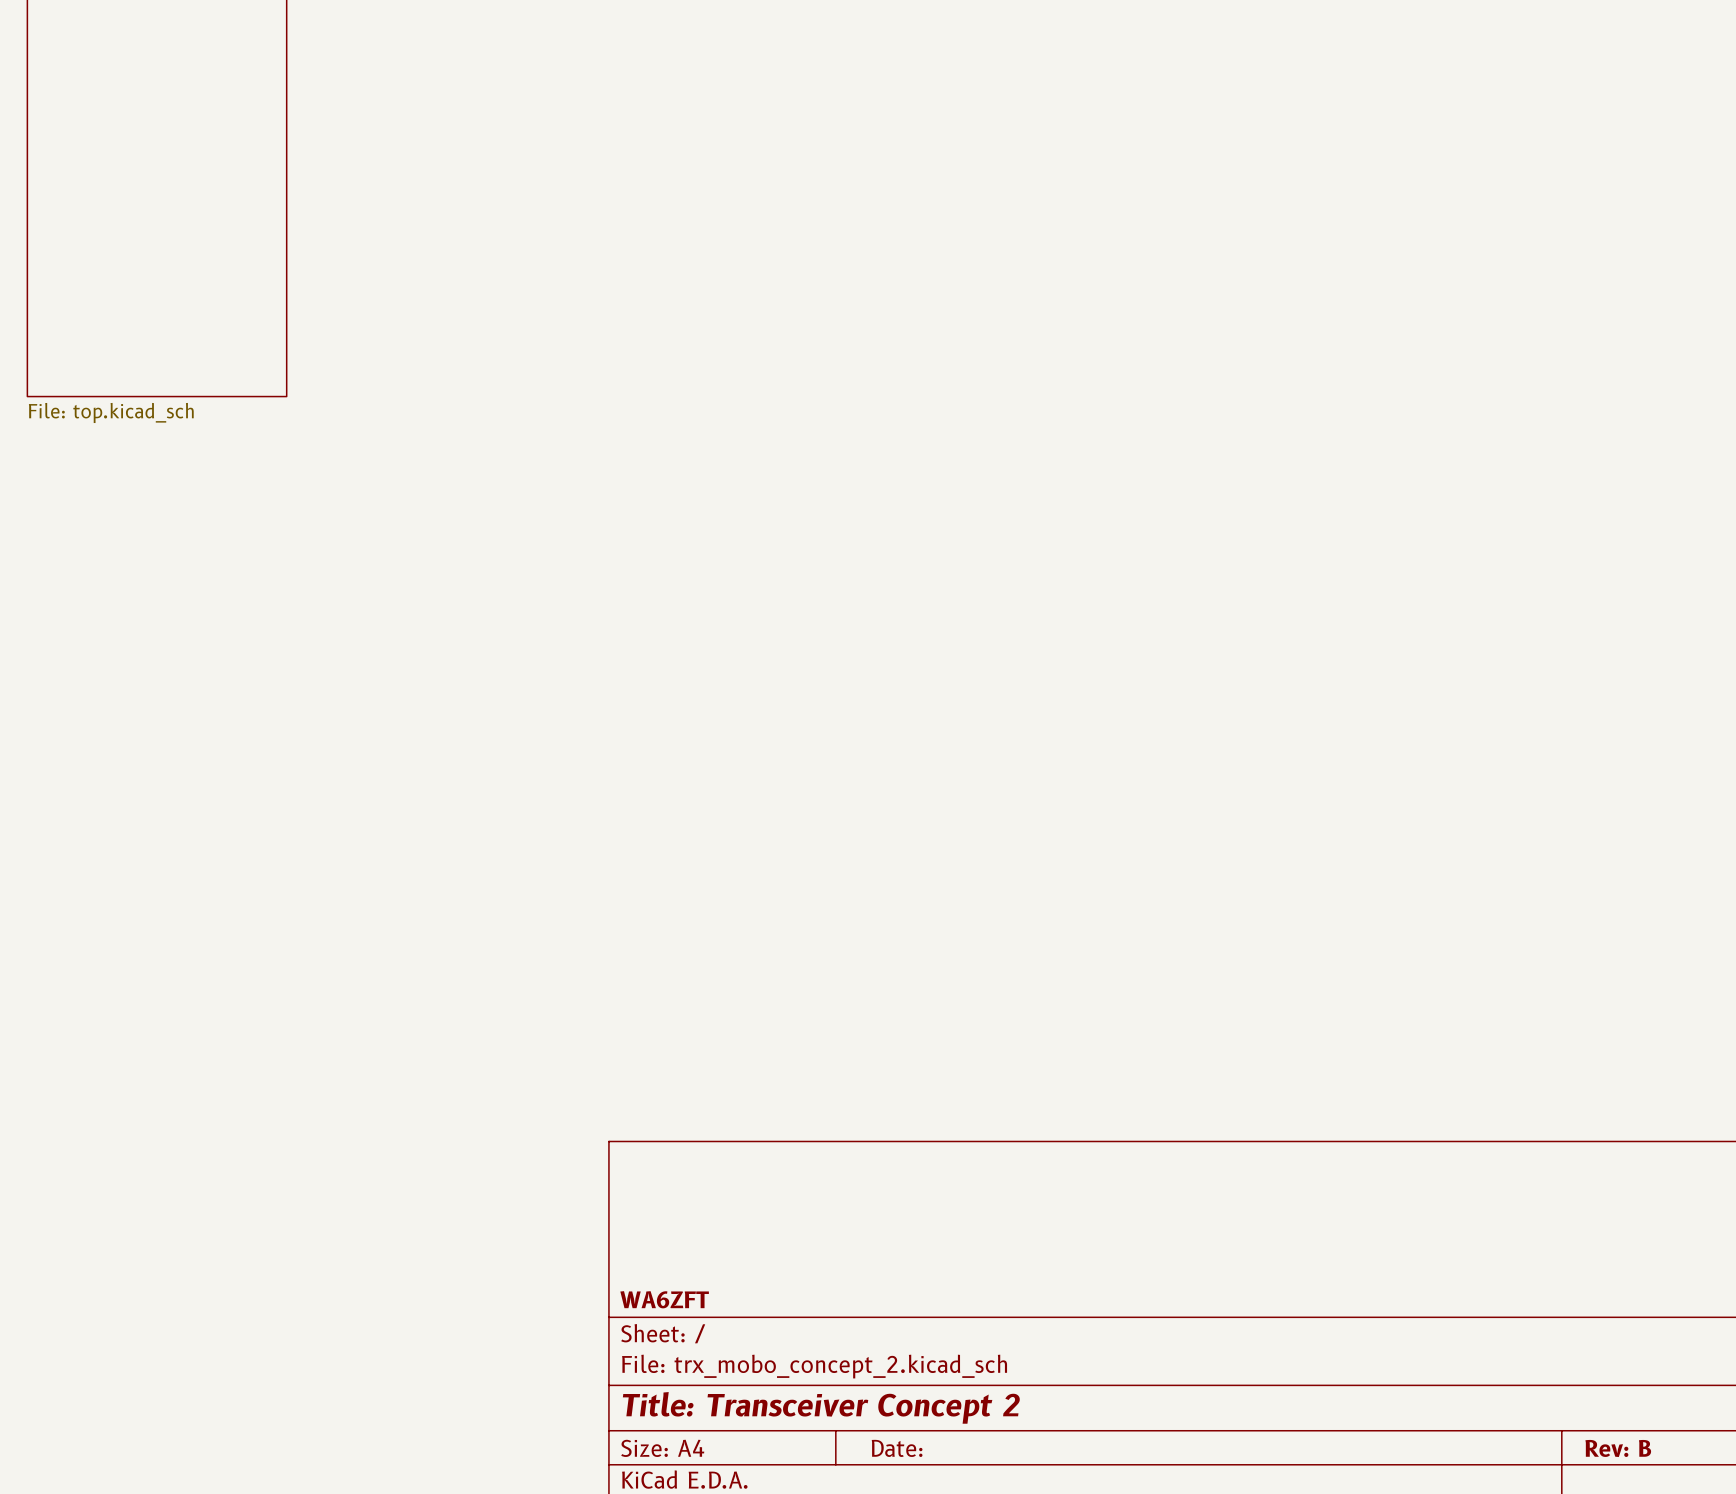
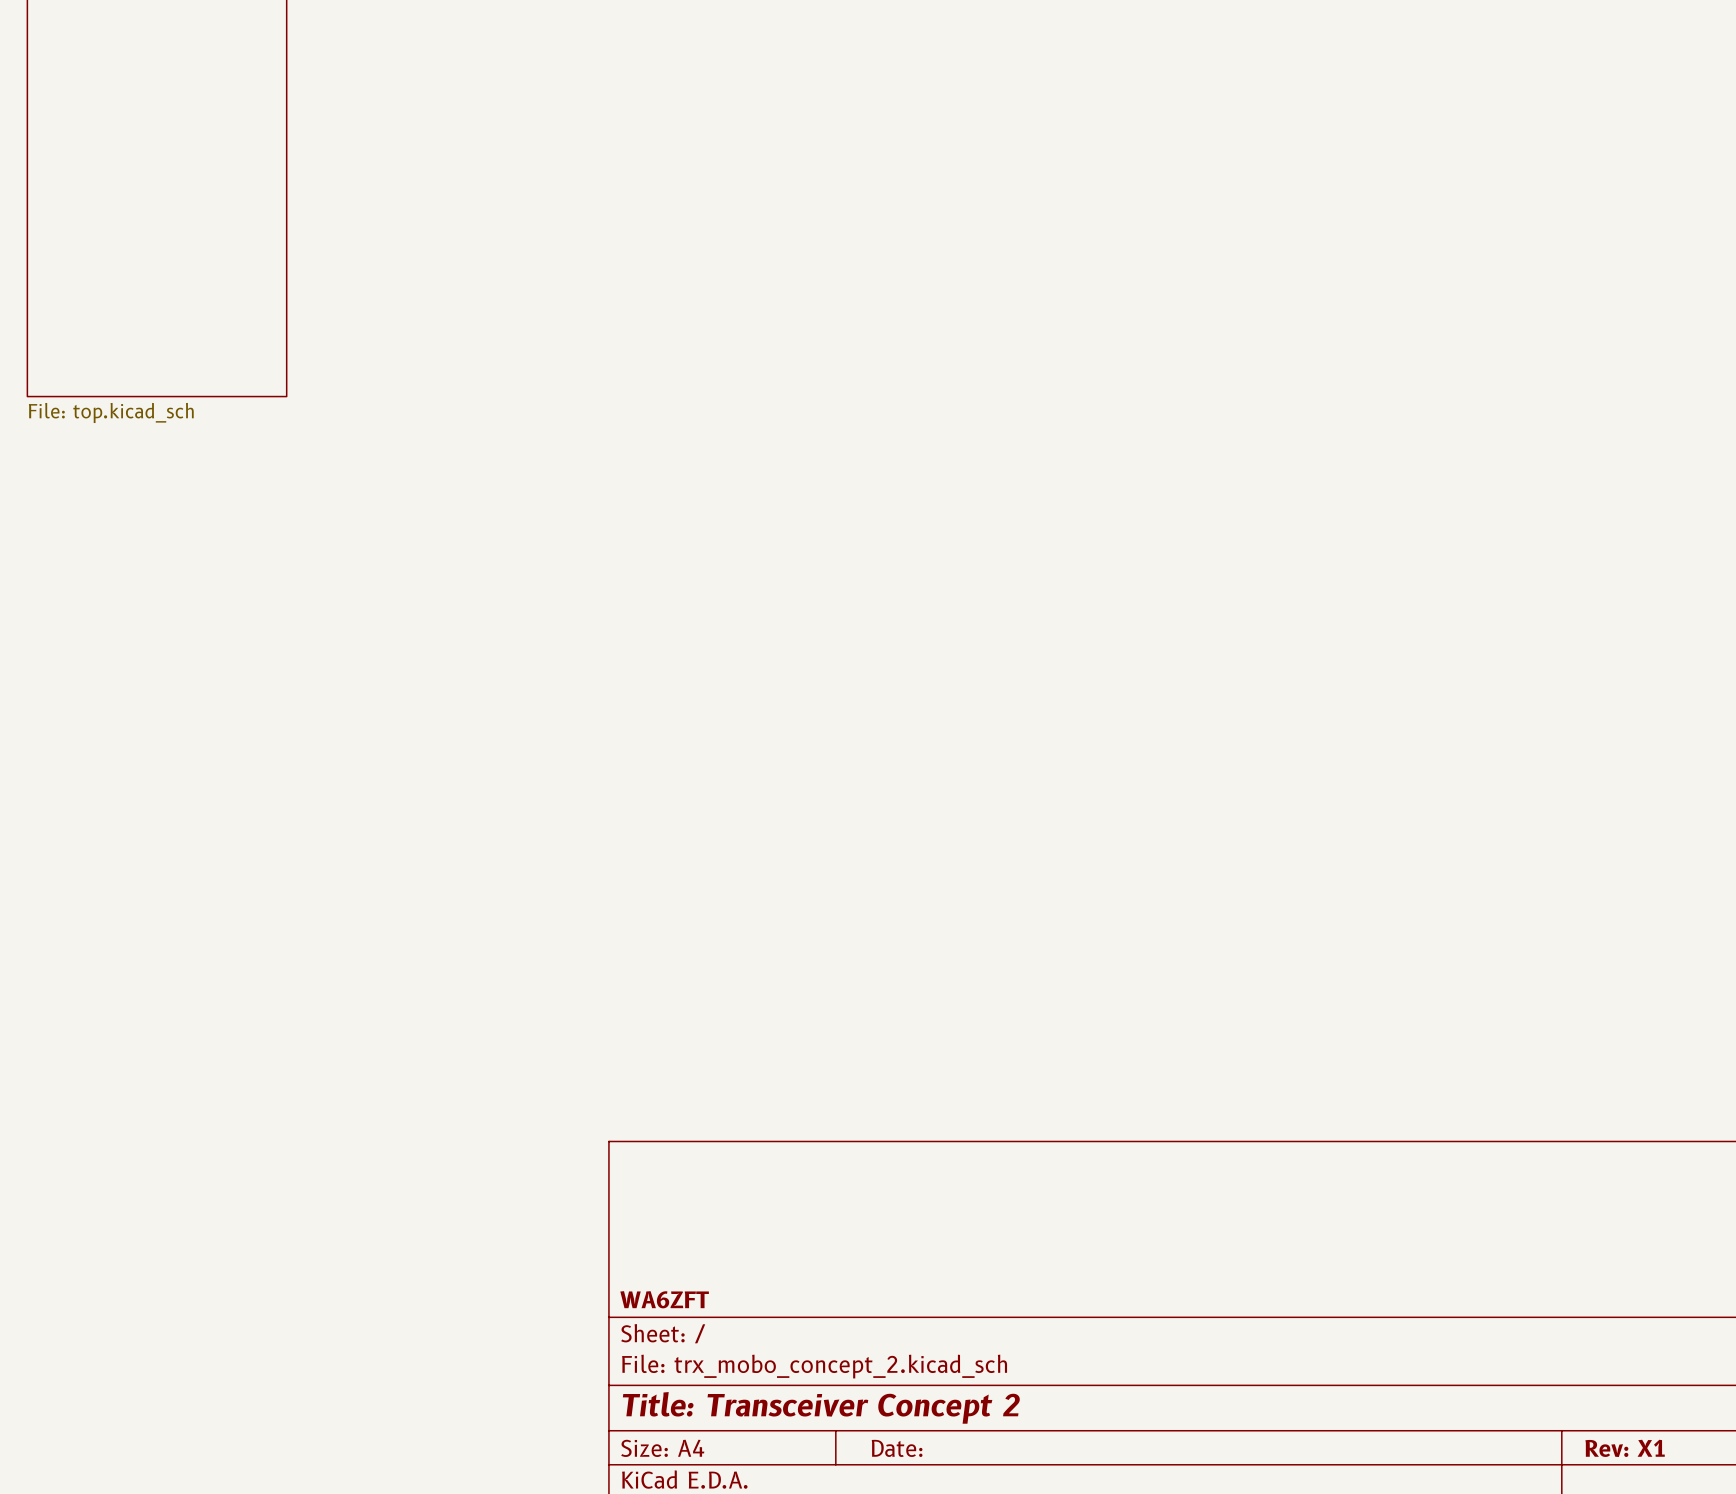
title block: Rev: B (1618, 1448) -> Rev: X1 (1625, 1448)

